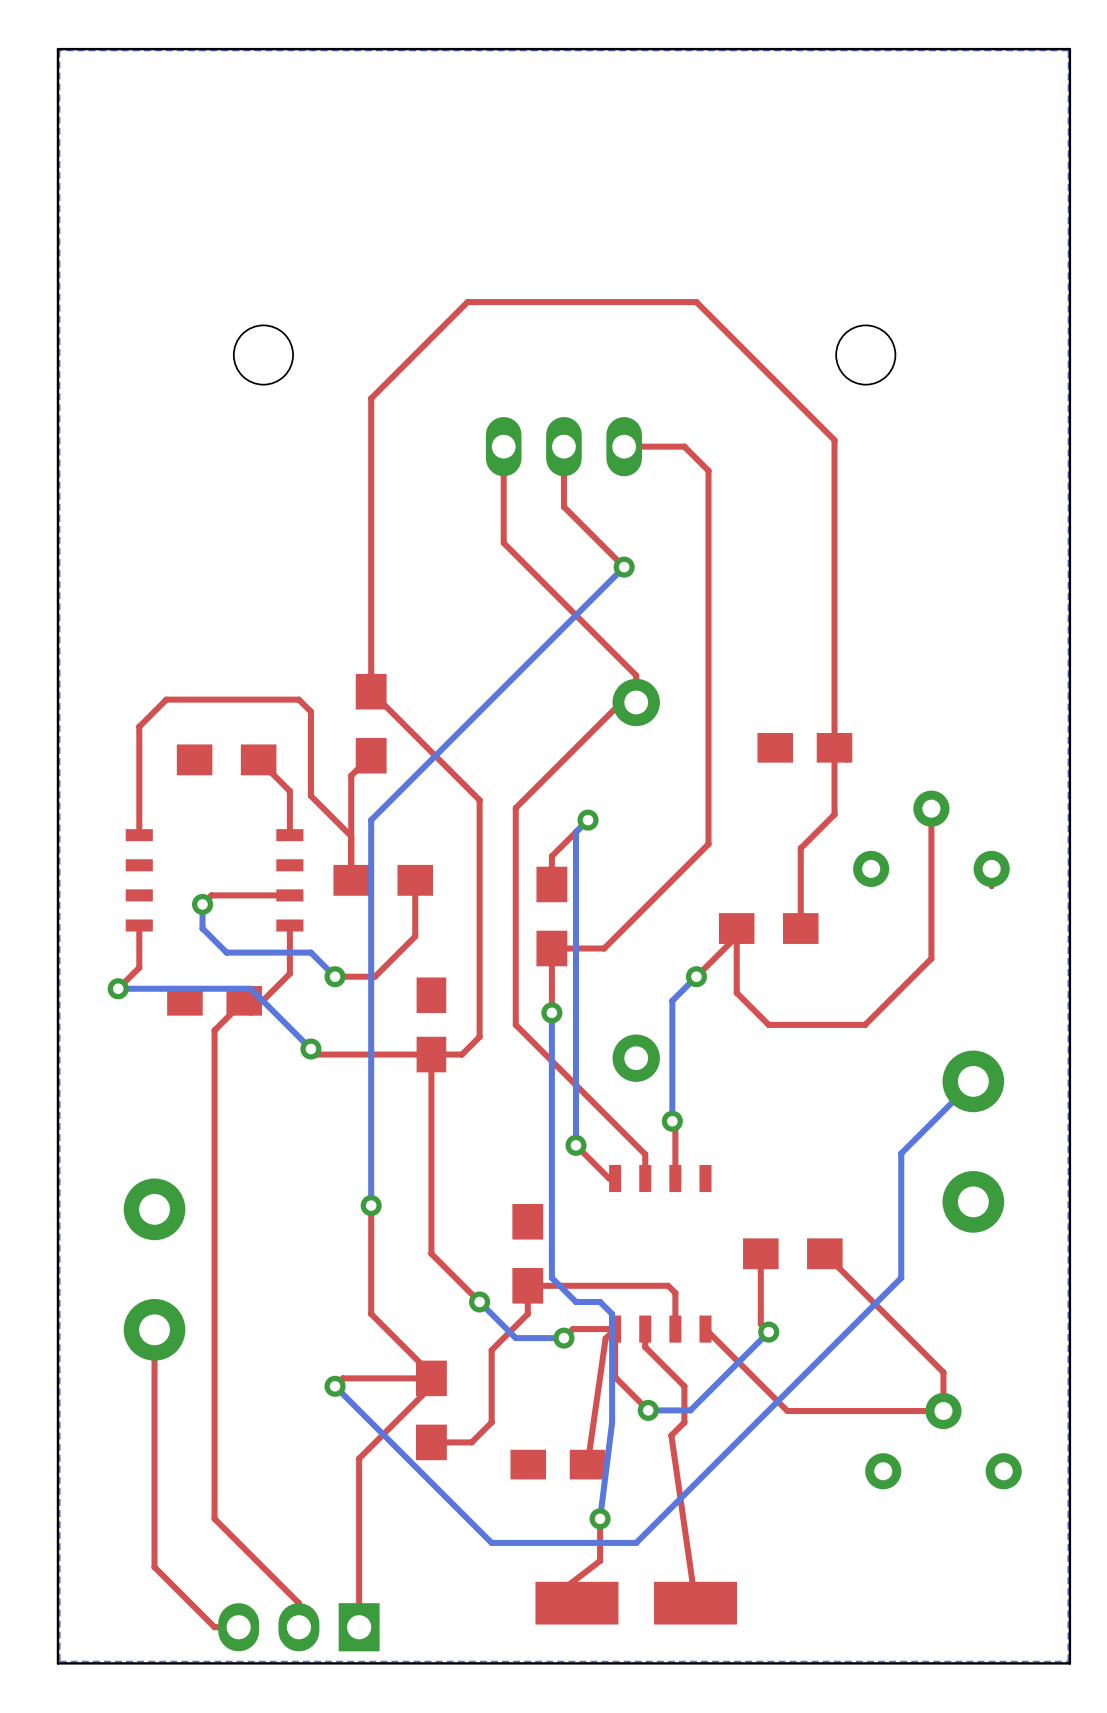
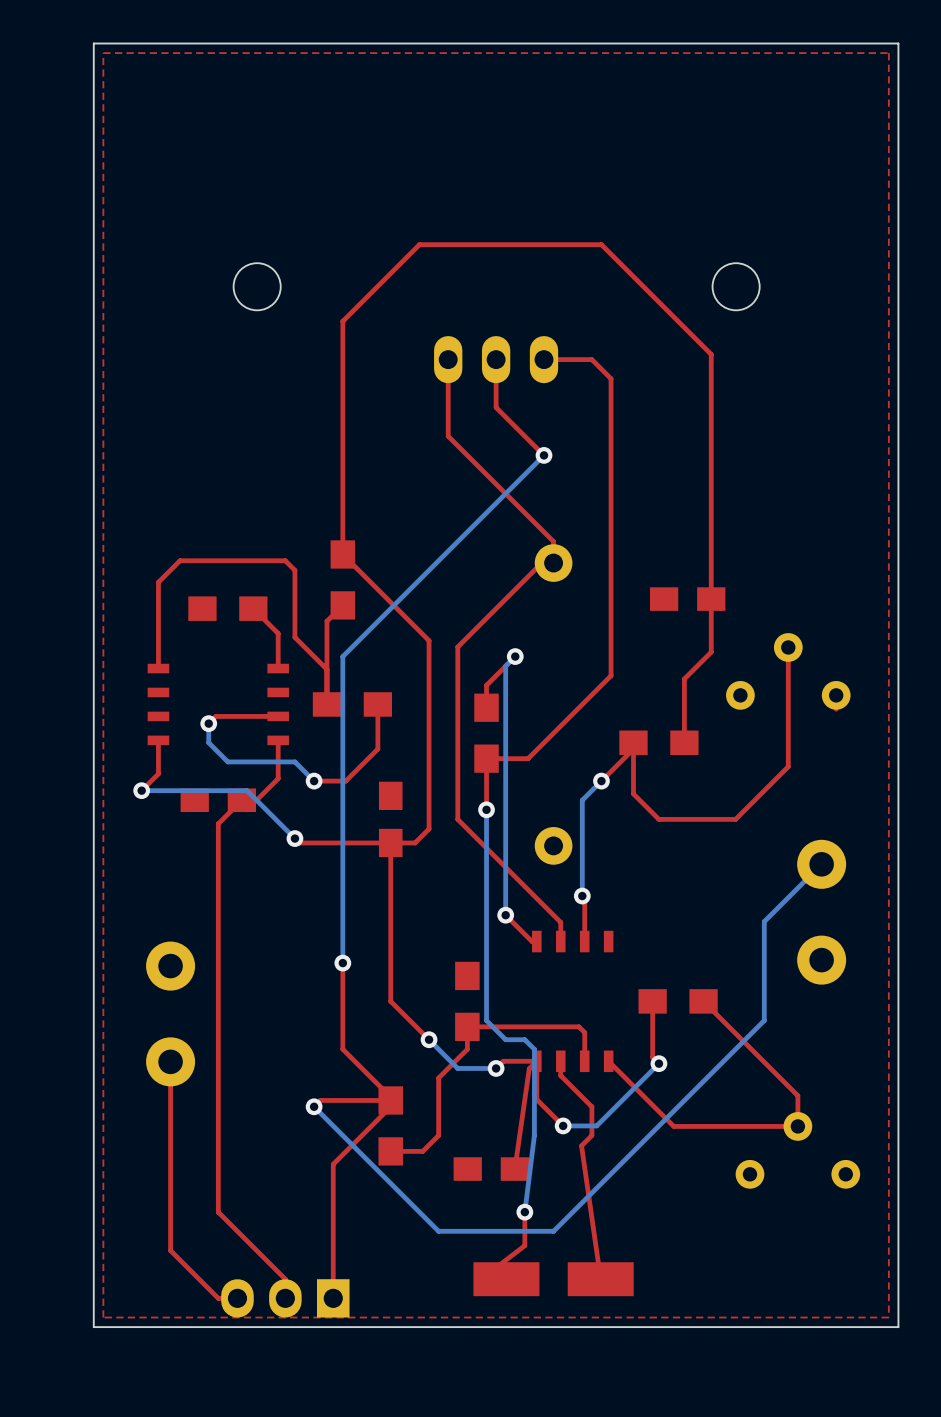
bottom zone outline: (1068, 50) (1068, 1661) (59, 1661) (59, 50) (1068, 50) -> none
top zone outline: none -> (888, 53) (888, 1317) (103, 1317) (103, 53) (888, 53)

